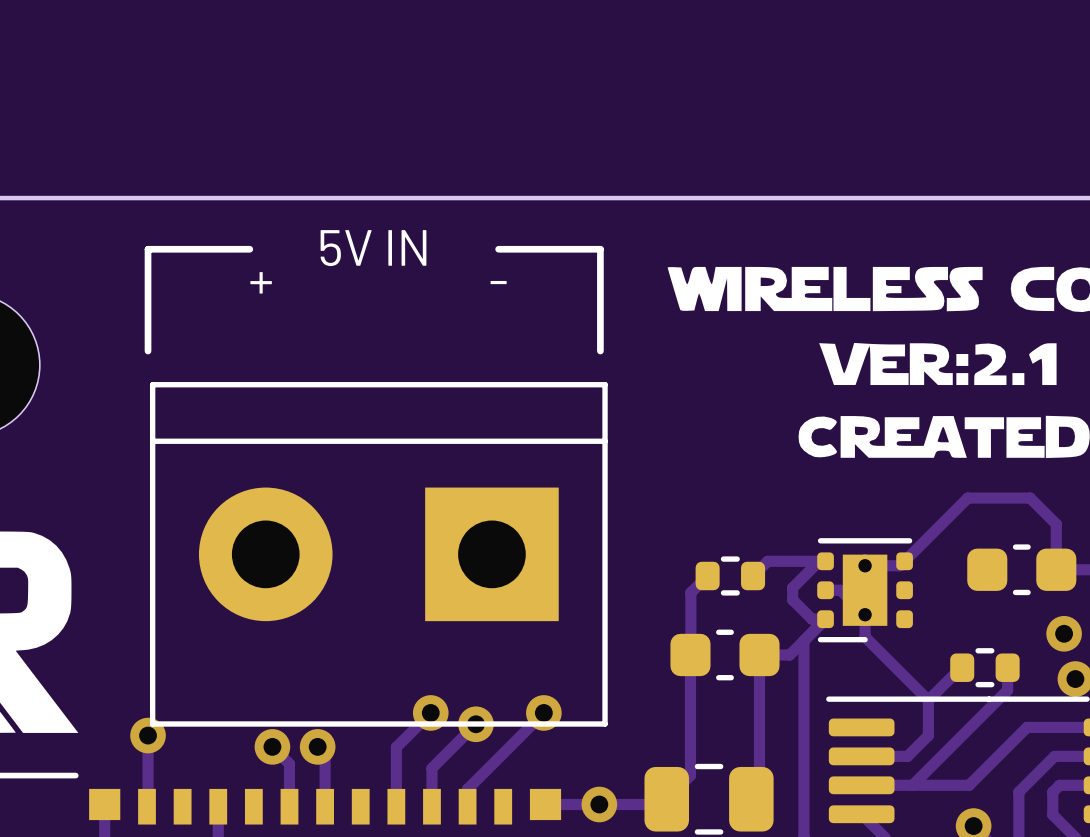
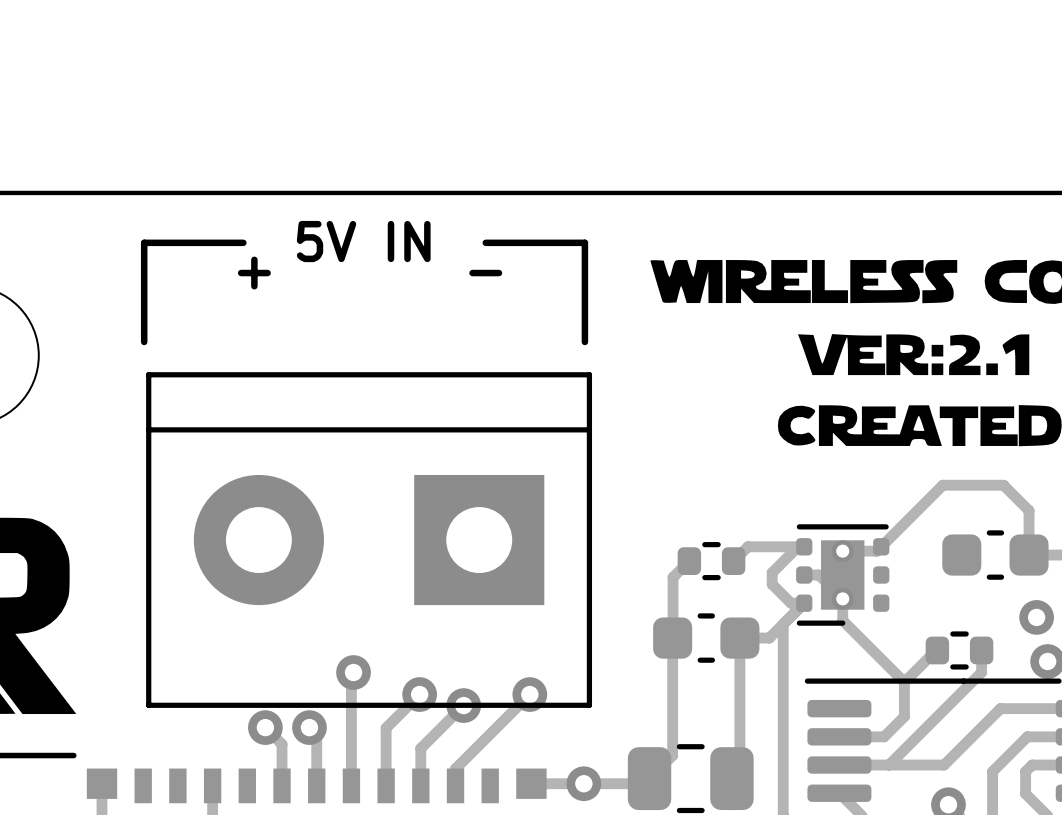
track: none -> (353, 672) (351, 674) (351, 785)
via: none -> (353, 672)
track: (148, 735) (147, 806) -> none
via: (148, 735) -> none

